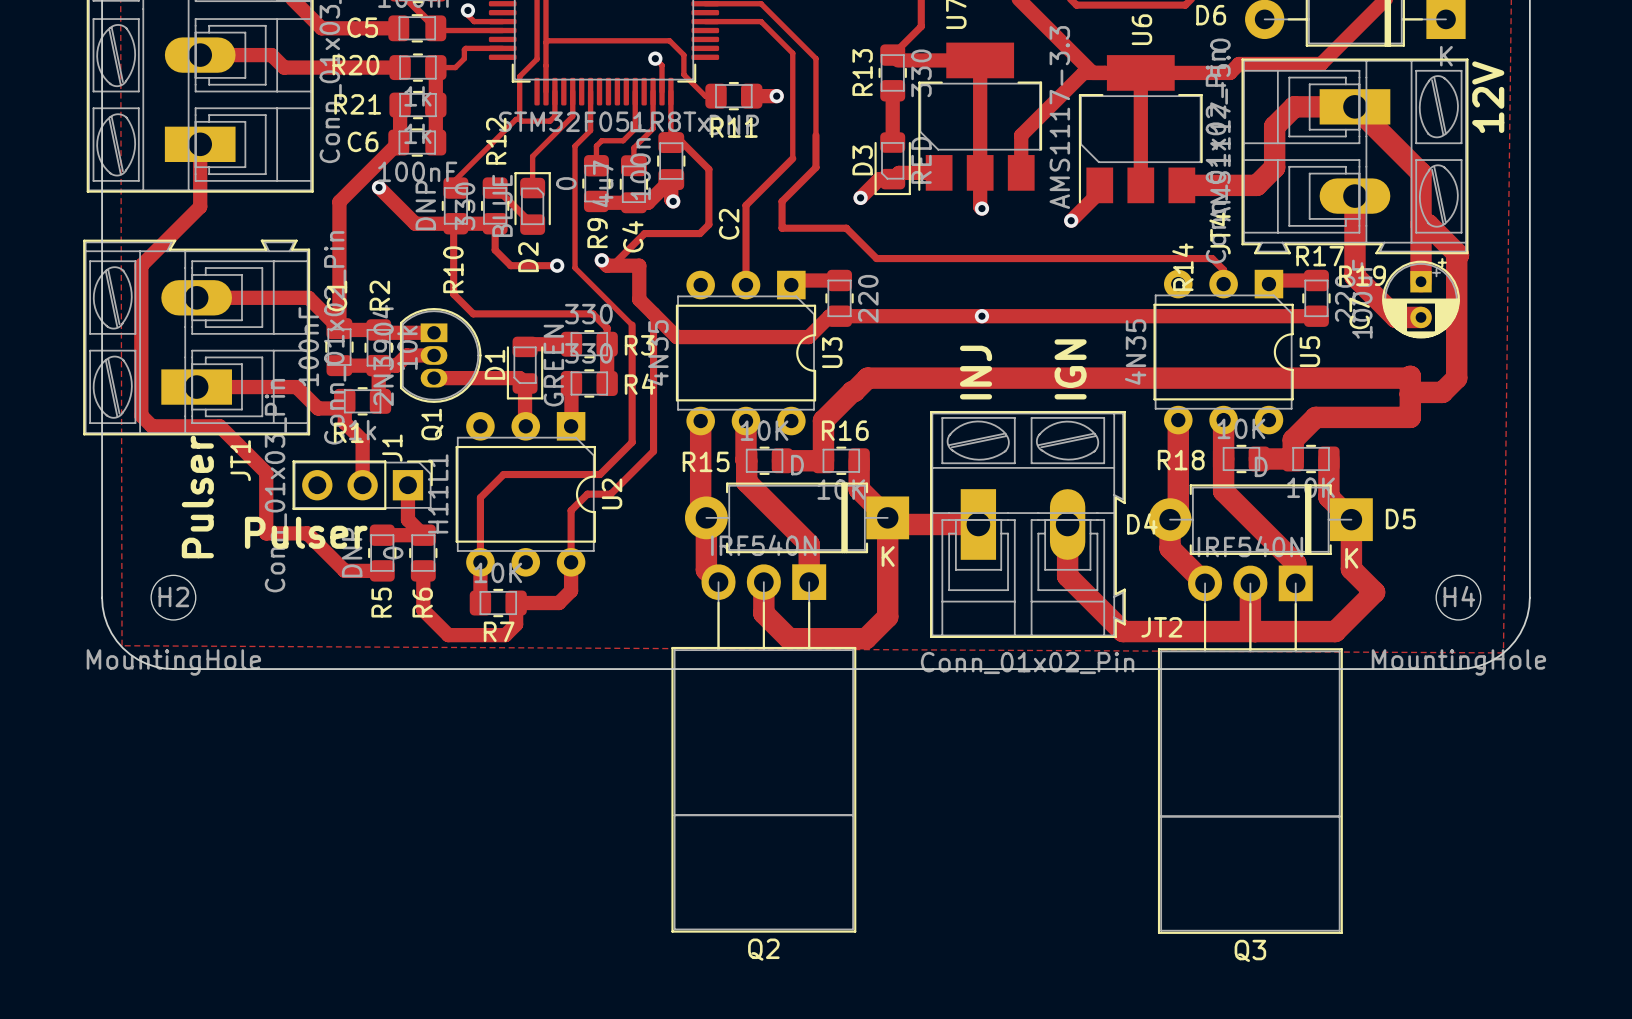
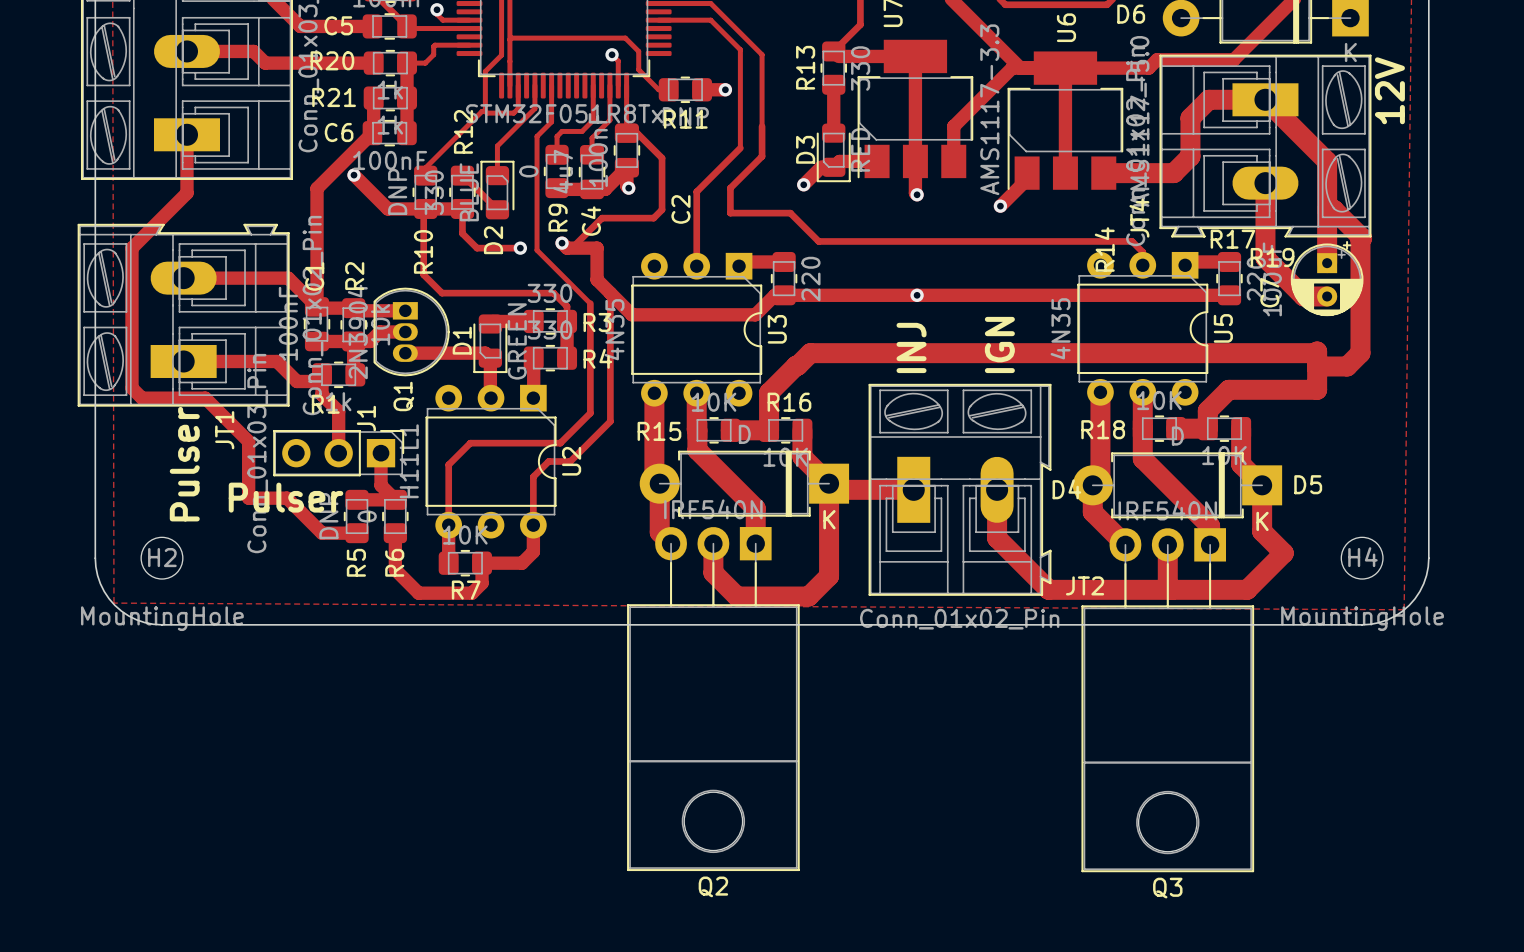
Q2 footprint: [671, 564, 857, 933] -> [627, 527, 800, 872]
Q3 footprint: [1157, 565, 1343, 934] -> [1081, 528, 1255, 873]

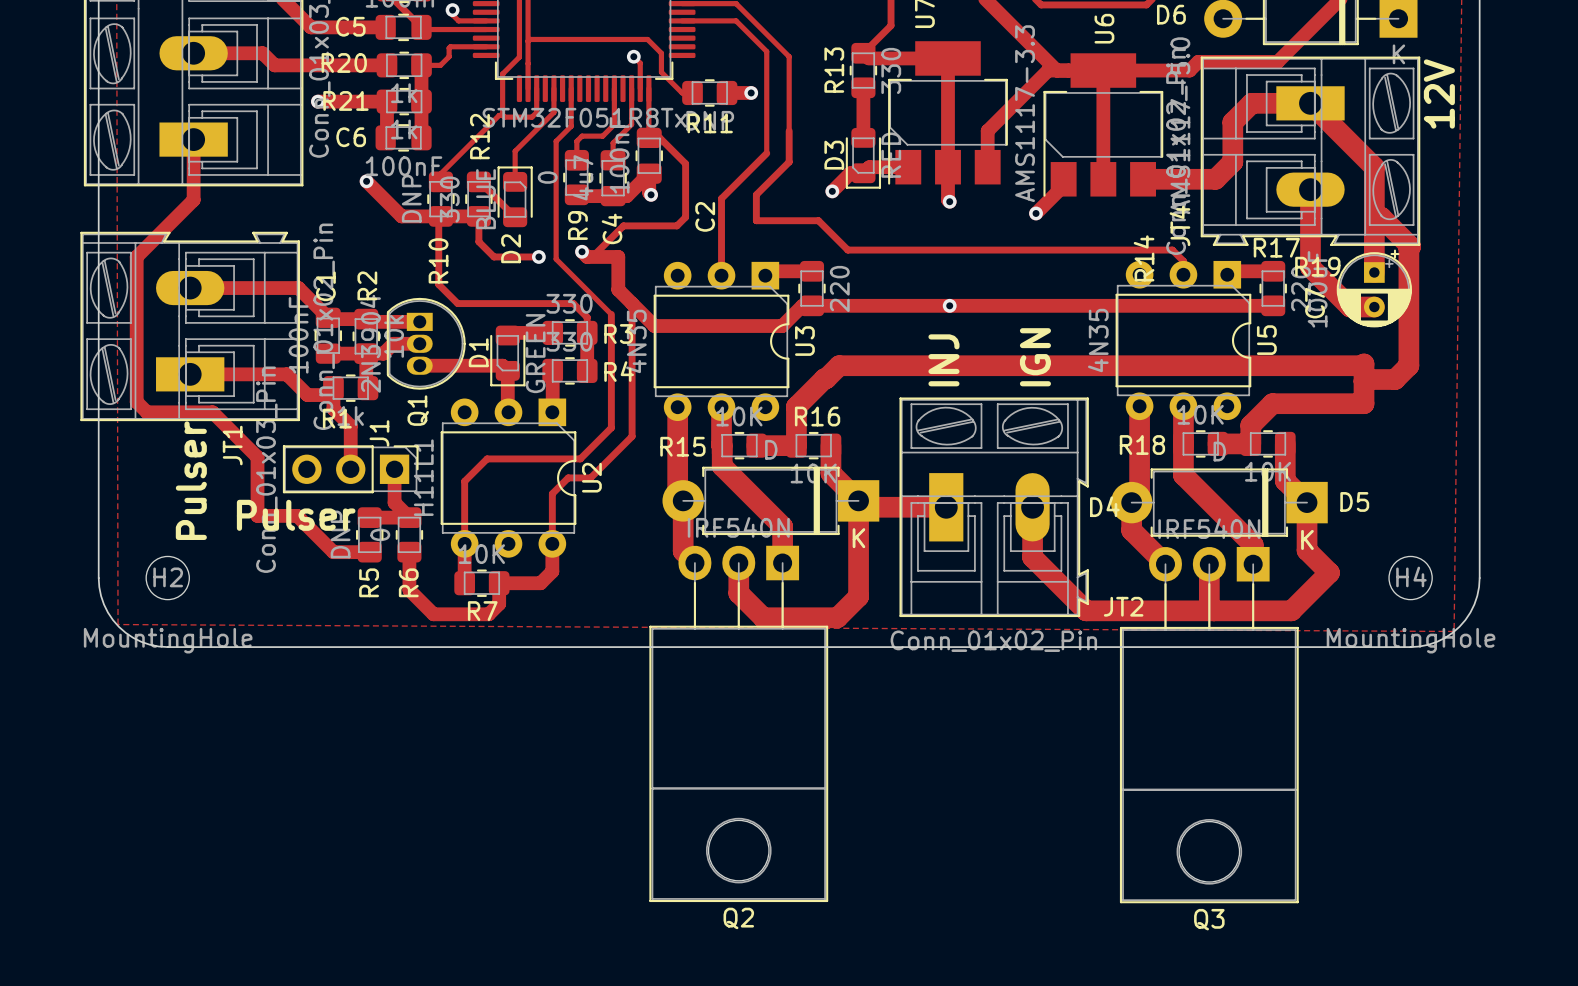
track: none -> (317, 101) (386, 101)
via: none -> (317, 101)
track: (372, 133) (317, 188) (317, 306) -> none

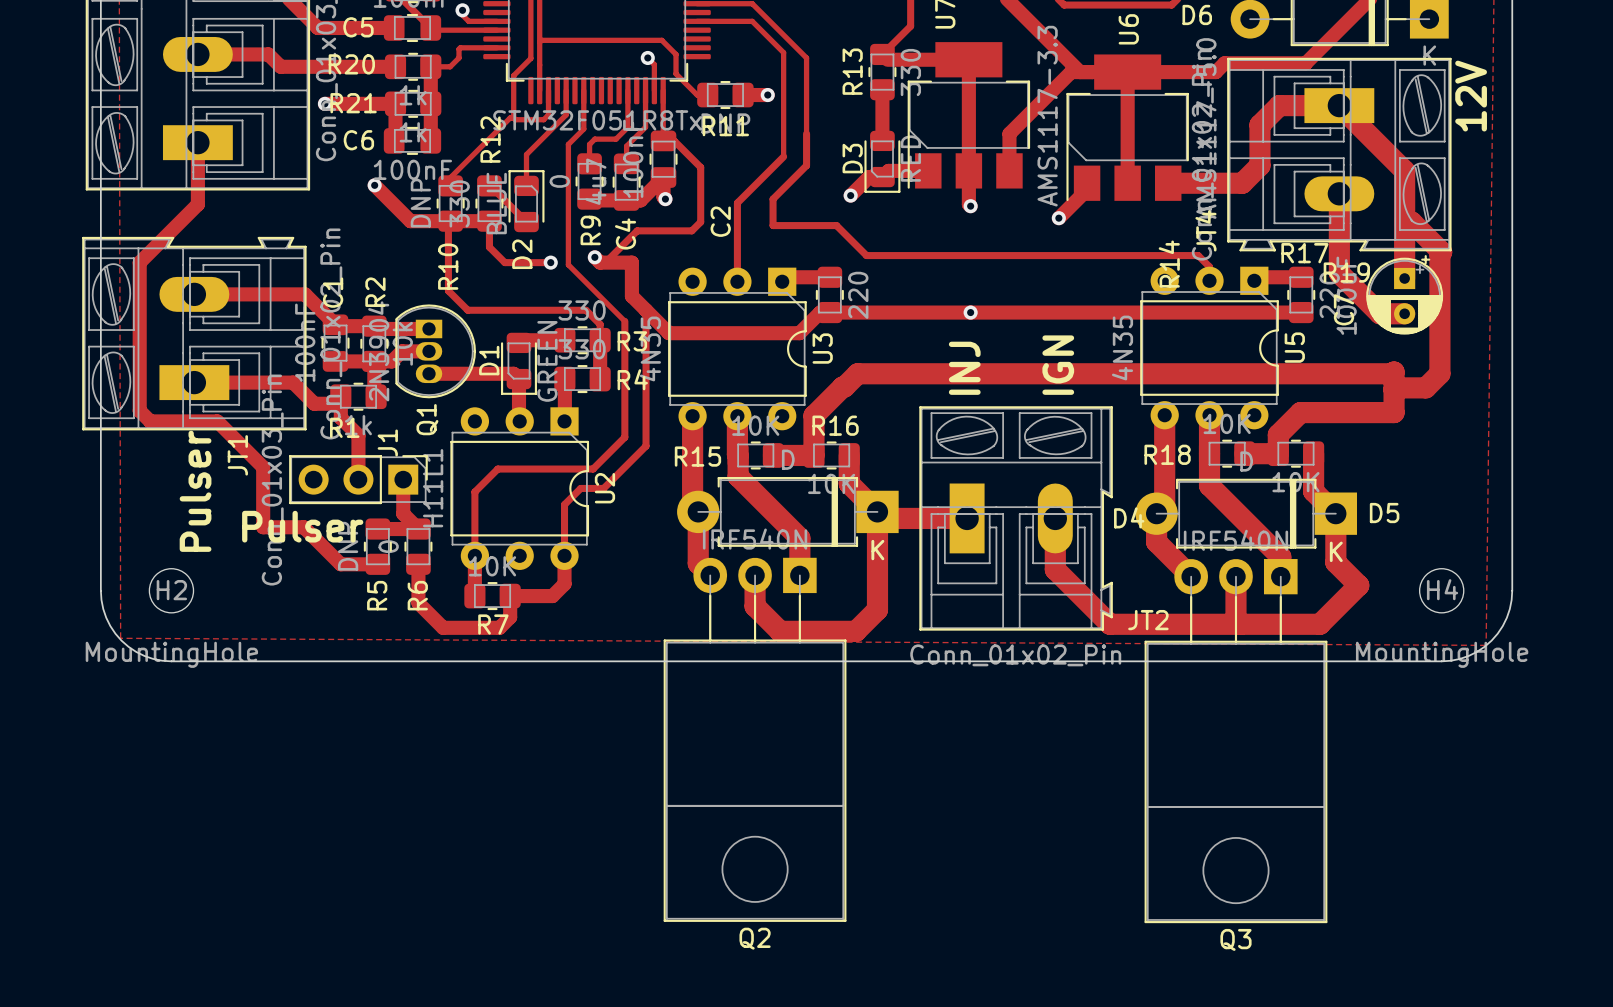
Q2 footprint: [649, 545, 829, 903] -> [663, 557, 847, 922]
Q3 footprint: [1119, 546, 1299, 904] -> [1144, 559, 1328, 924]

